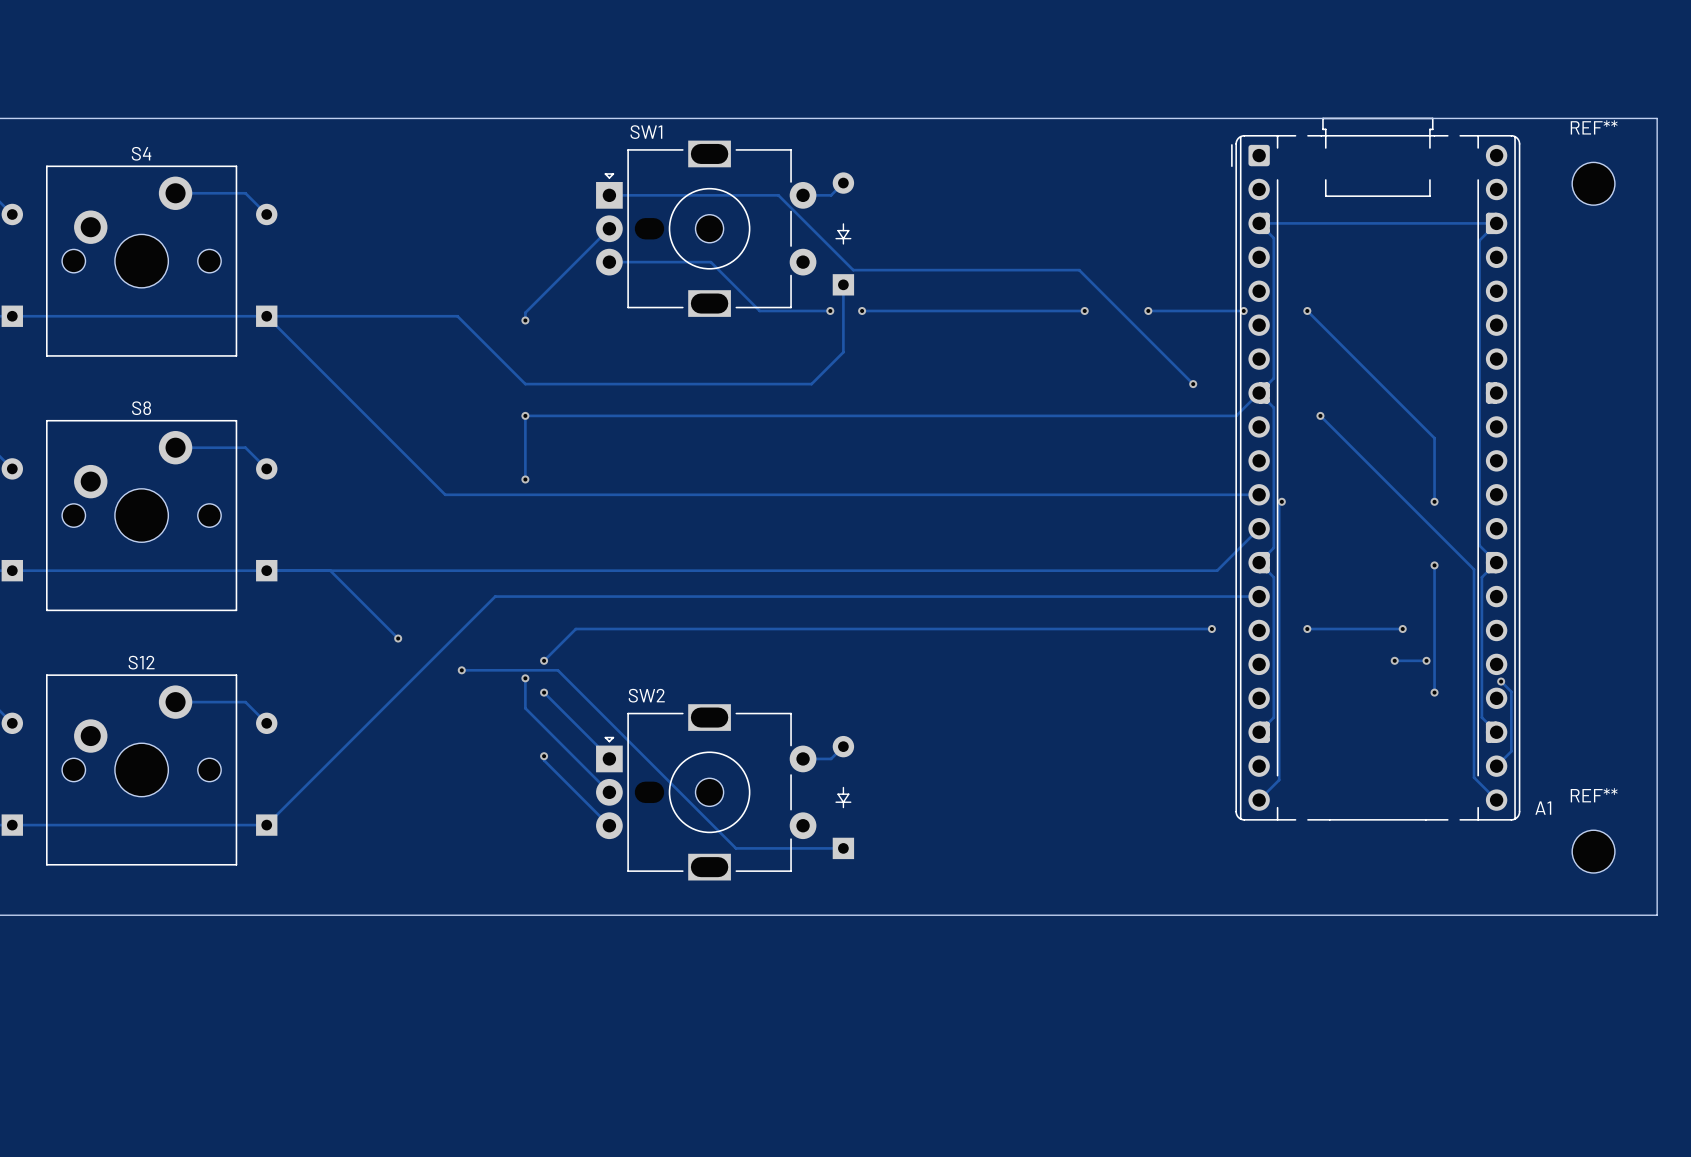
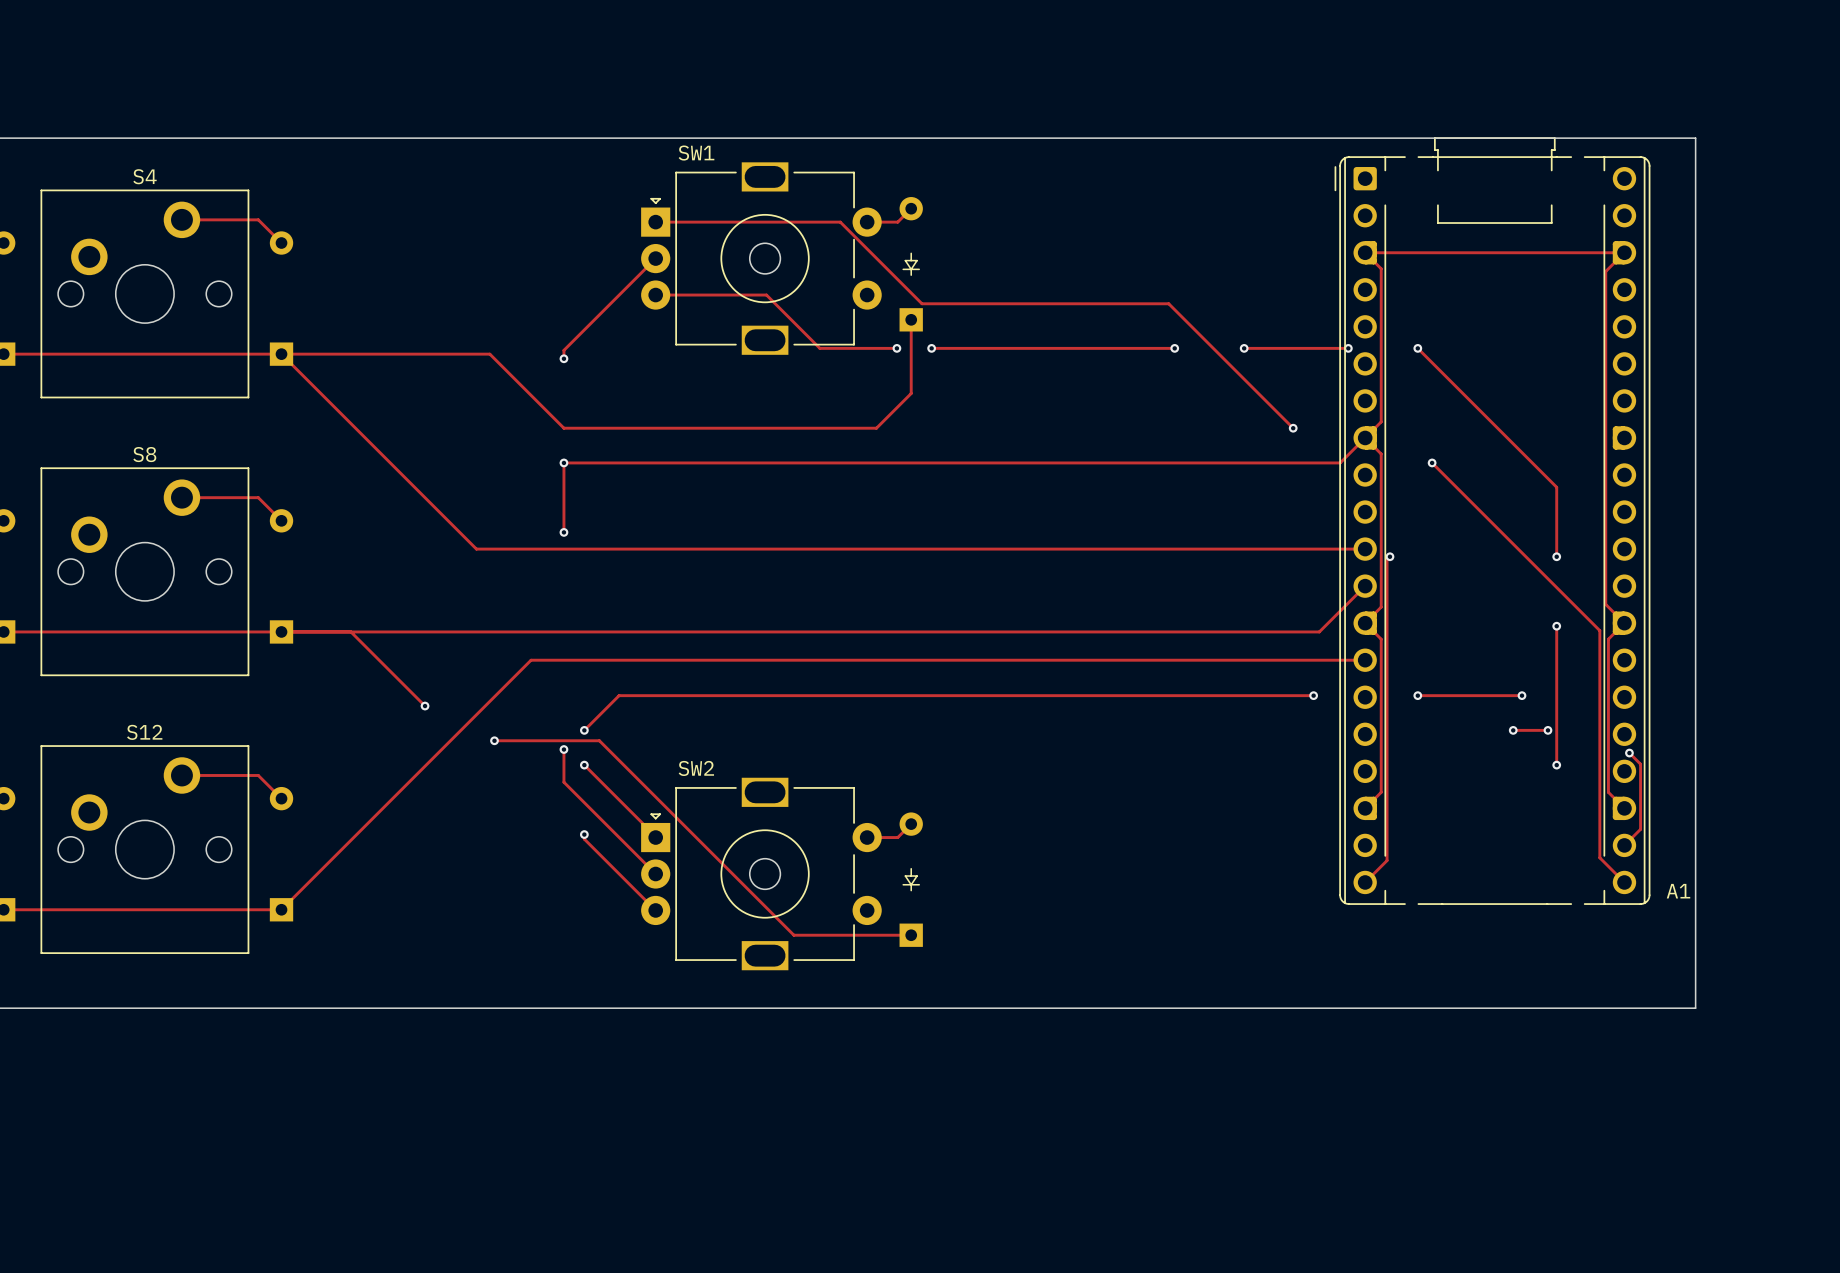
board edge: (1561, 118) (1657, 118) (1657, 915) (1561, 915) -> (1695, 138) (1695, 1008)
REF**: (1593, 183) -> none
REF**: (1593, 851) -> none

